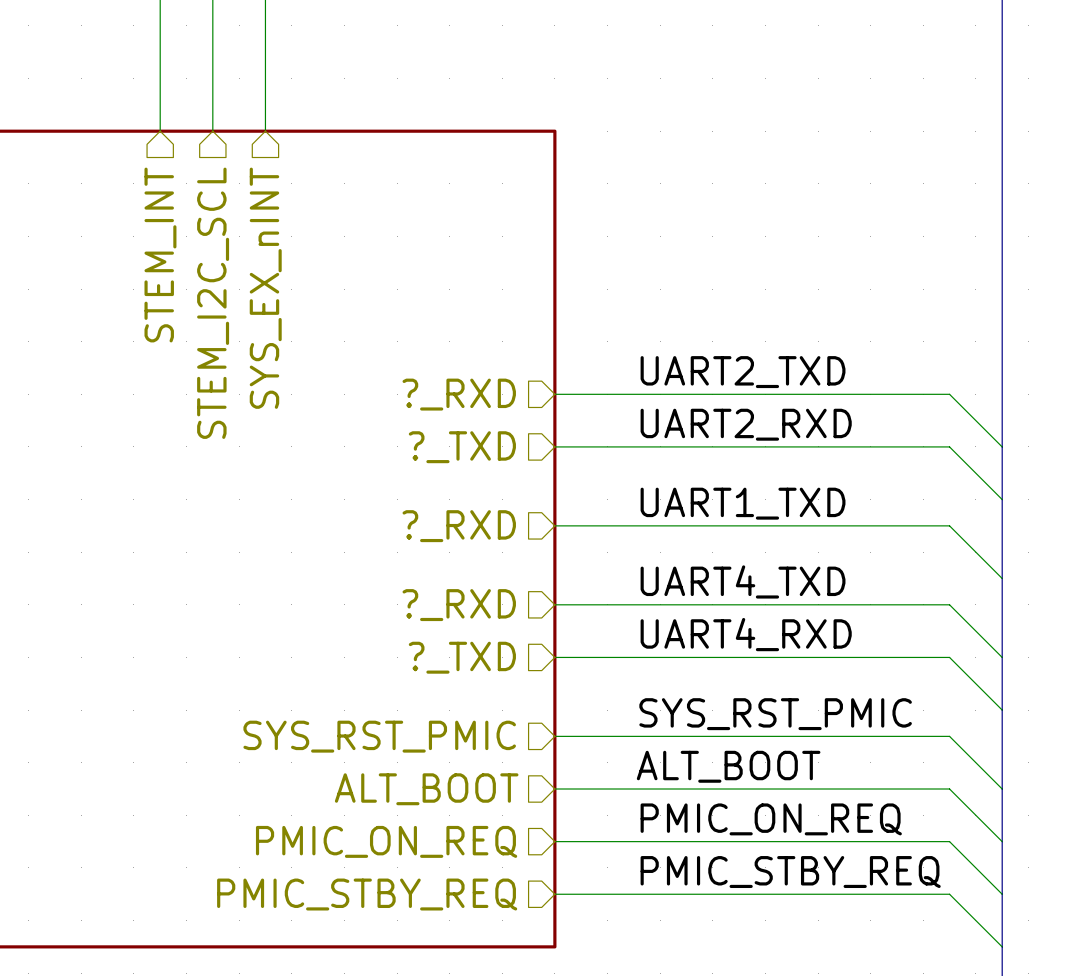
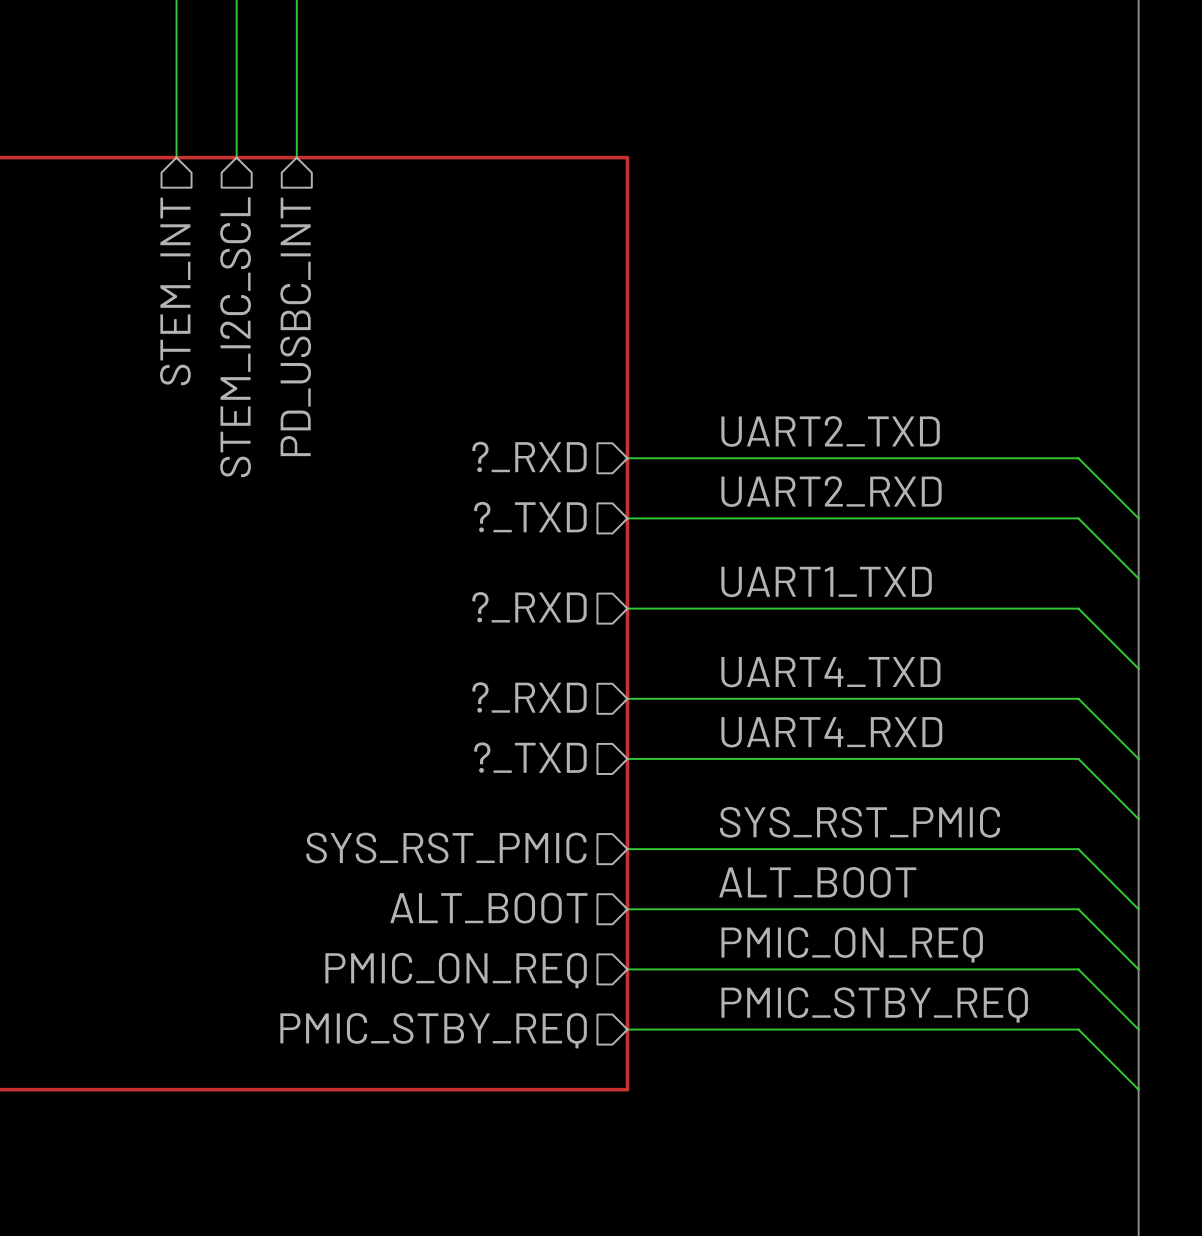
hierarchical label: SYS_EX_nINT (265, 288) -> PD_USBC_INT (295, 326)

